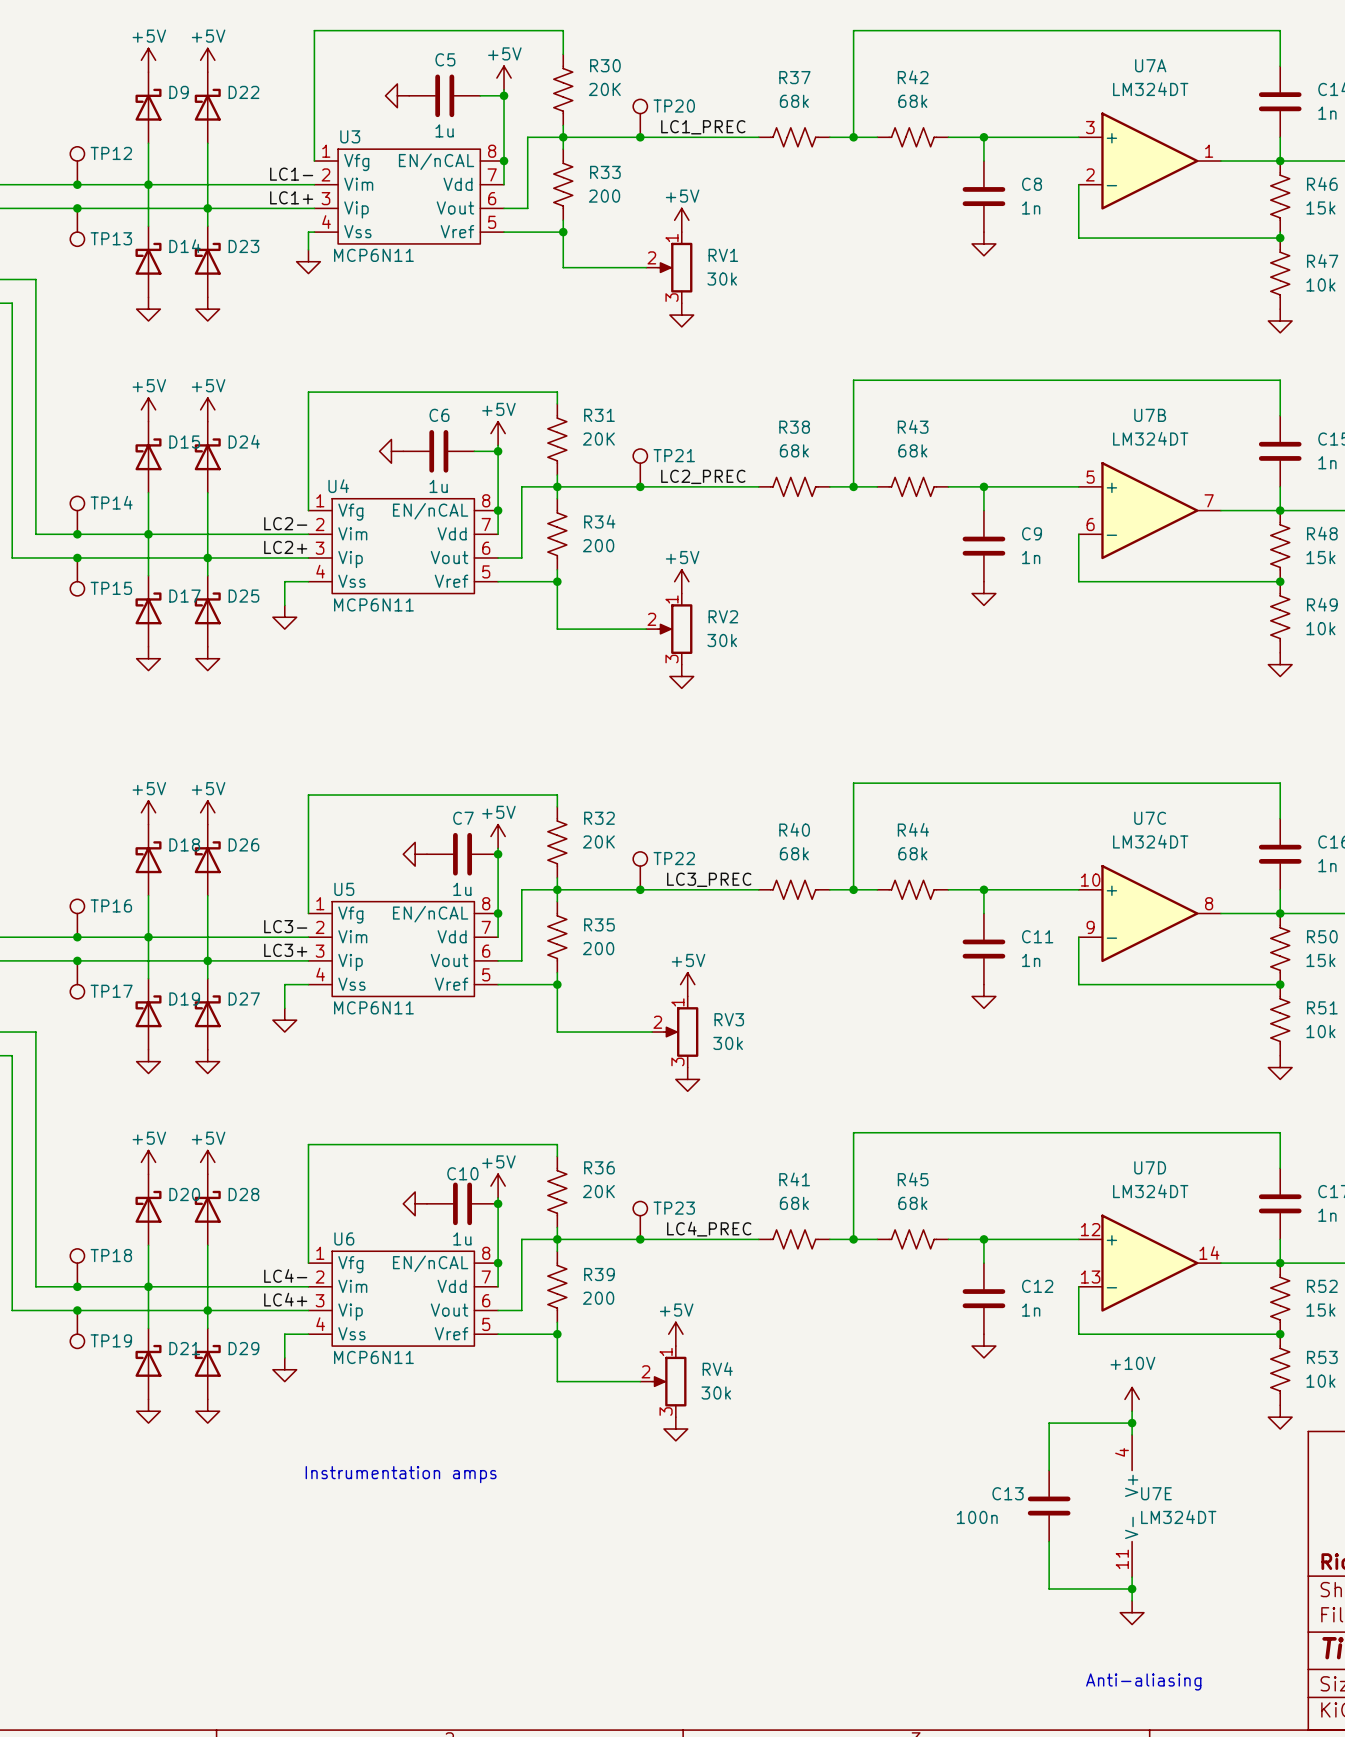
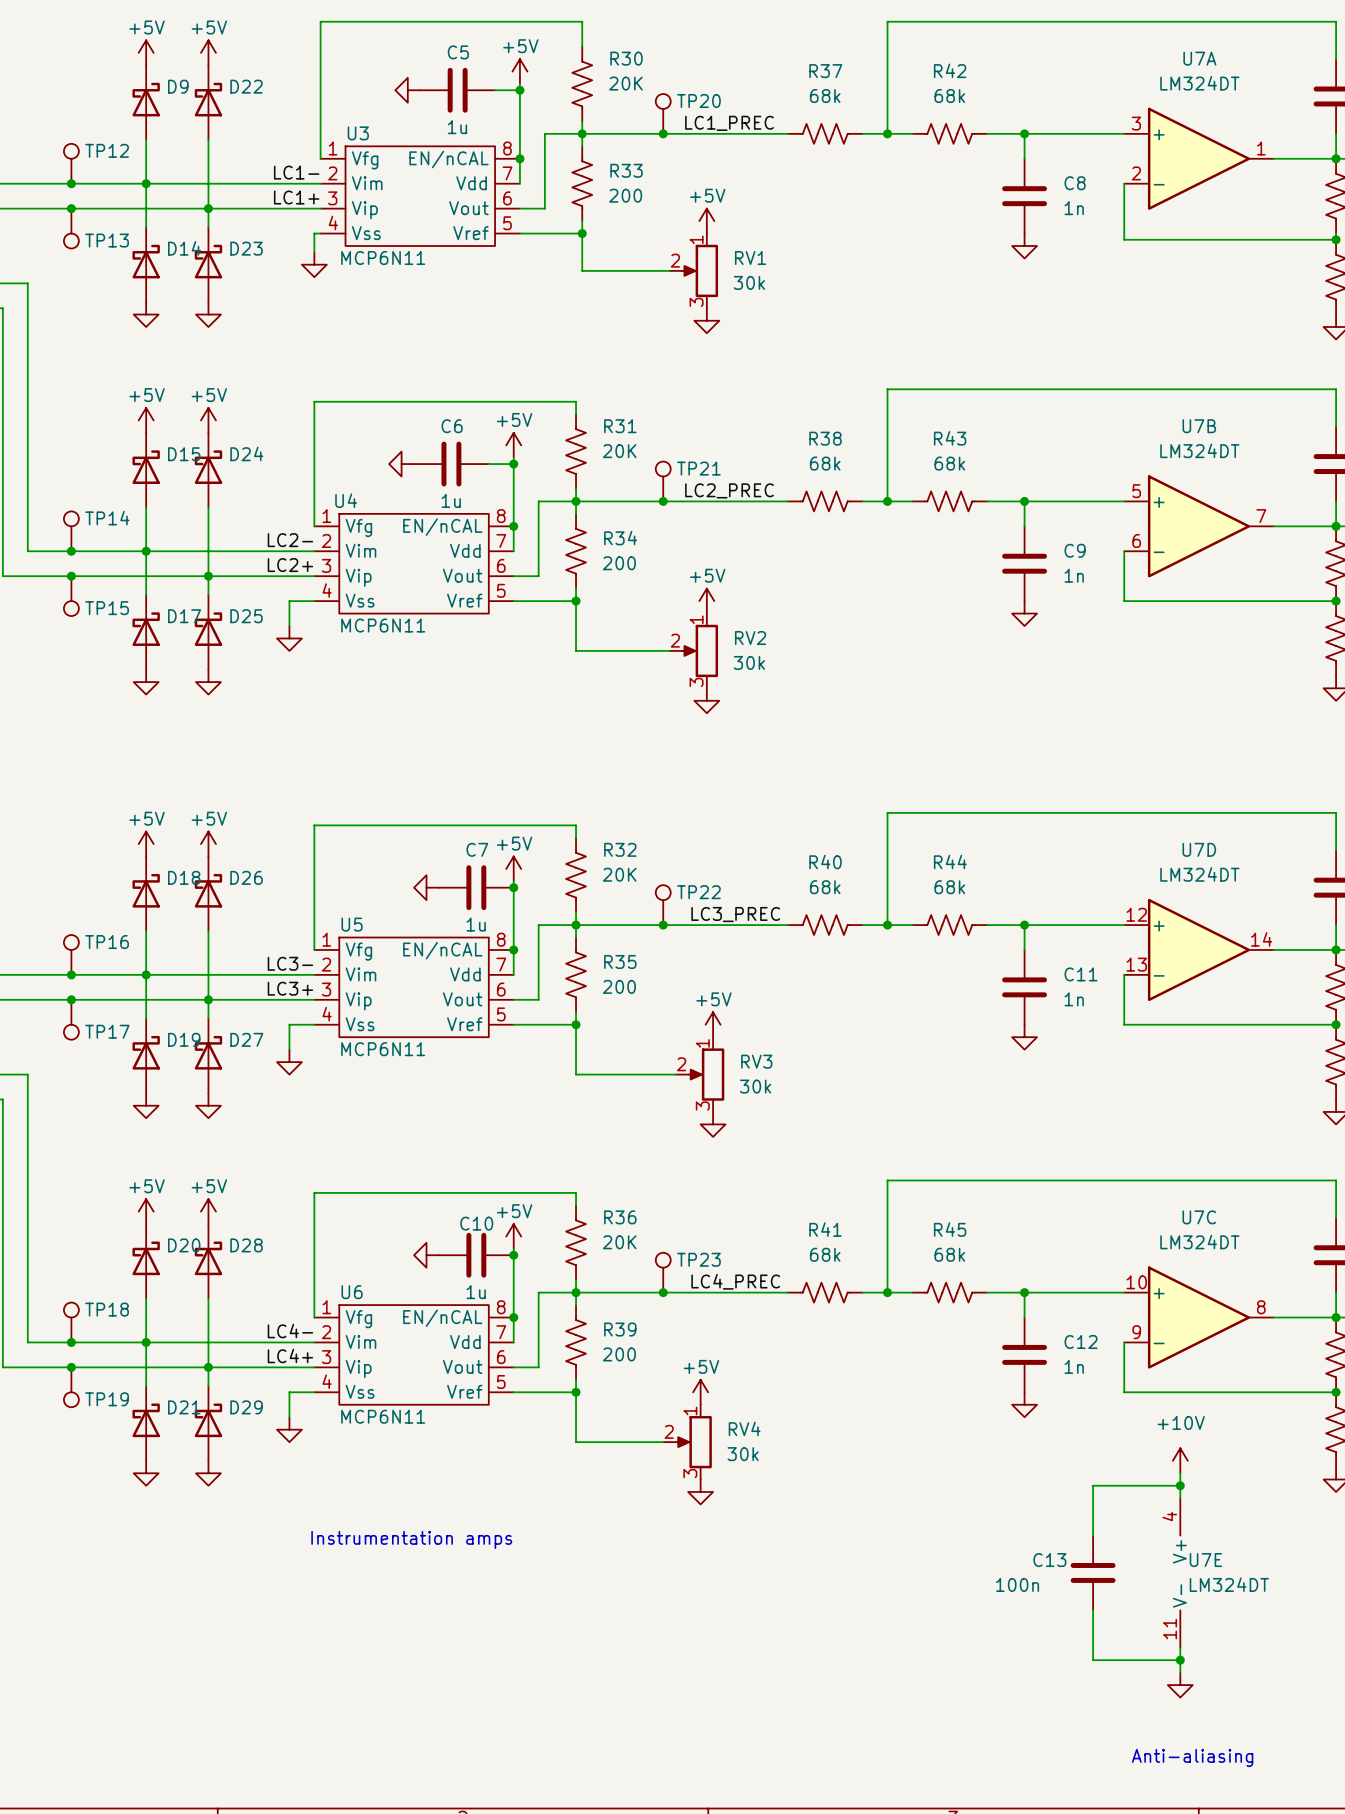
U7C position: (1149, 913) -> (1199, 1317)
U7D position: (1149, 1263) -> (1199, 949)

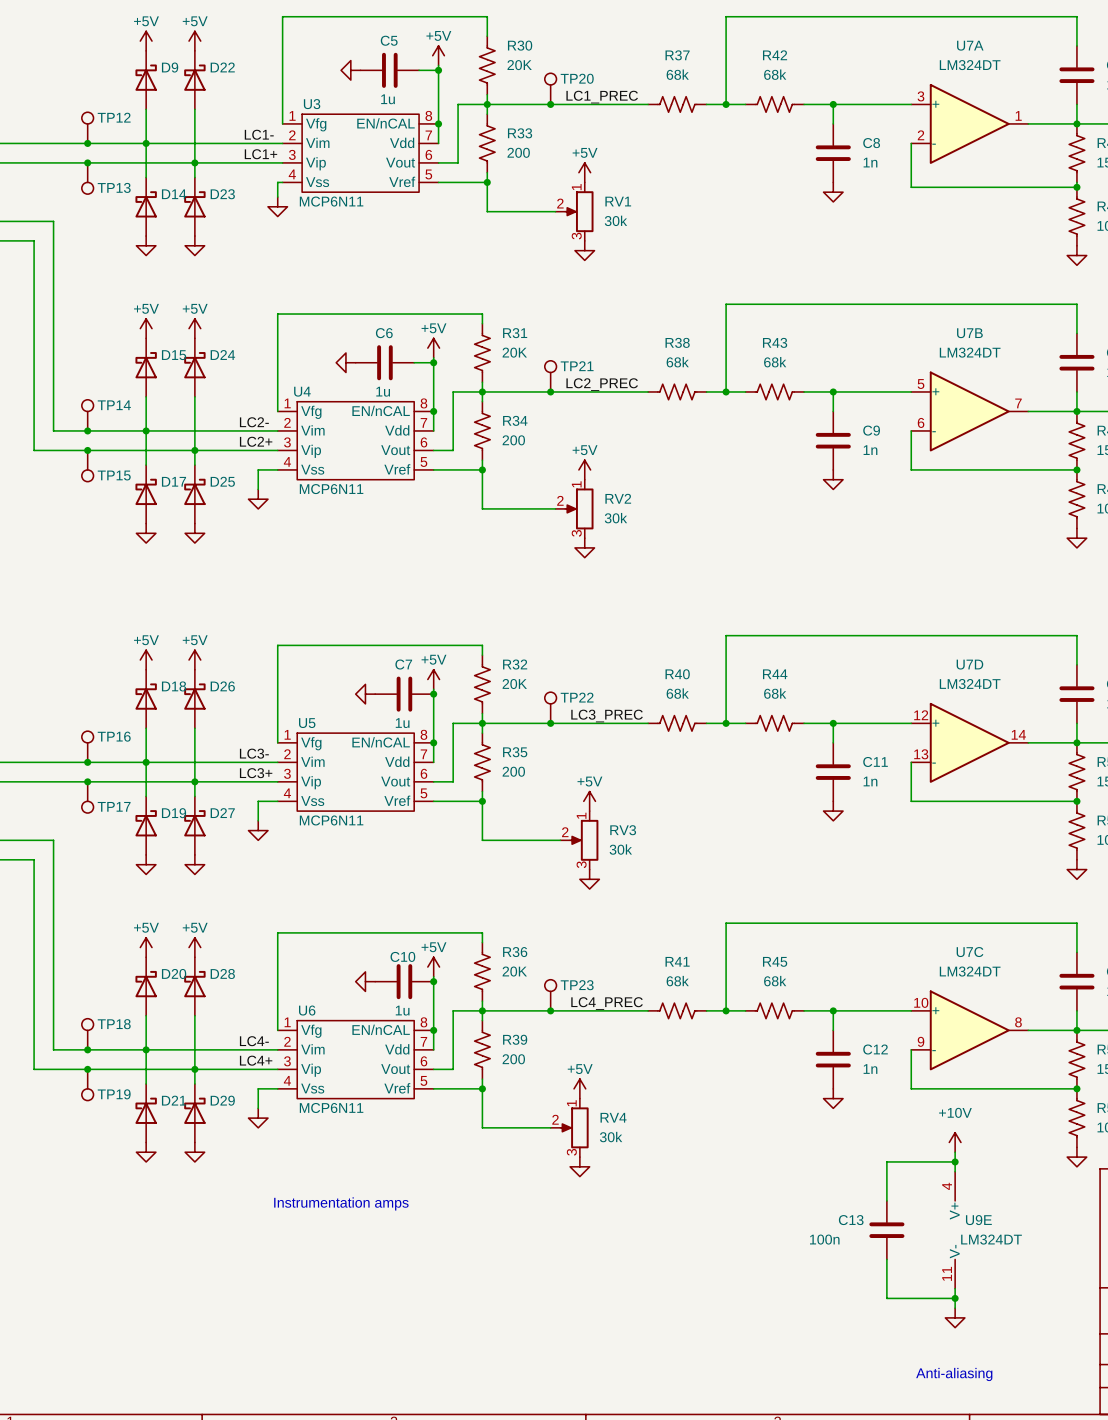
U7E name: U7E (1205, 1560) -> U9E (978, 1220)

